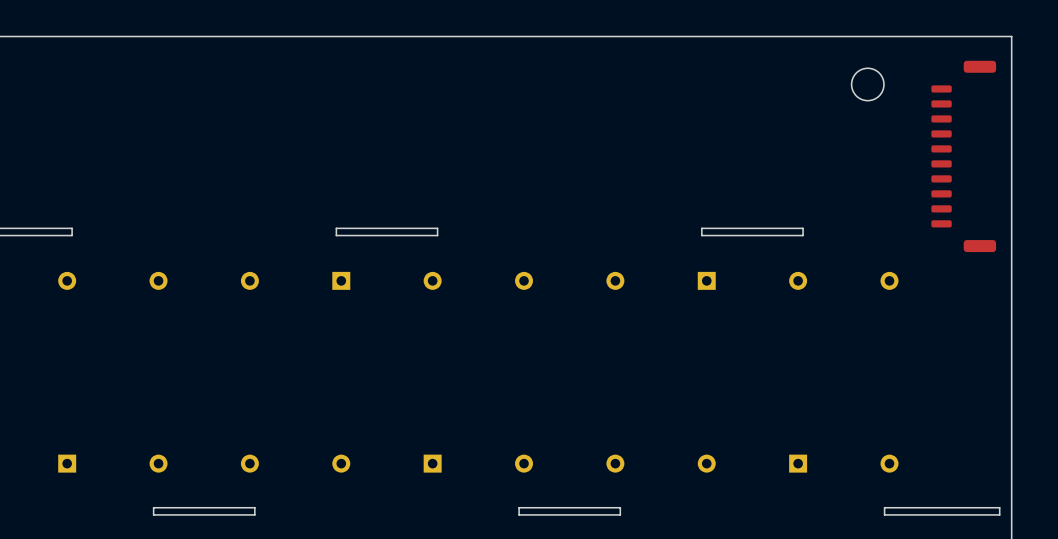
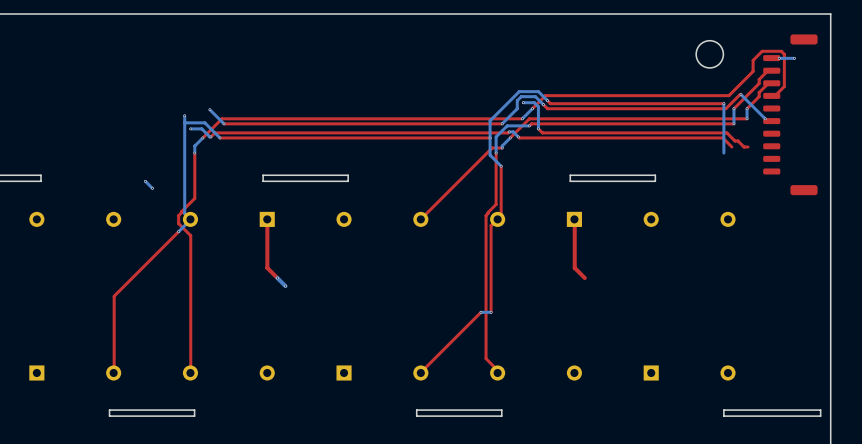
via: none -> (779, 58)
bottom track: none -> (794, 58) (779, 58)
via: none -> (794, 58)
top track: none -> (771, 70) (768, 70) (759, 79) (759, 83) (733, 108)
top track: none -> (771, 83) (768, 83) (759, 92) (759, 96) (747, 108)
top track: none -> (741, 94) (725, 108) (547, 108) (543, 104)
bottom track: none -> (741, 94) (765, 118)
via: none -> (741, 94)
top track: none -> (771, 95) (775, 95) (784, 86) (784, 54) (781, 51) (762, 51) (753, 60) (753, 71) (728, 95) (545, 95) (532, 108)
top track: none -> (547, 100) (550, 103) (723, 103)
bottom track: none -> (547, 100) (538, 91) (519, 91) (490, 120) (490, 155) (501, 166)
via: none -> (547, 100)
bottom track: none -> (523, 102) (534, 102) (538, 106) (538, 128)
via: none -> (523, 102)
bottom track: none -> (723, 103) (723, 153)
via: none -> (723, 103)
bottom track: none -> (543, 104) (535, 96) (521, 96) (517, 100) (517, 108) (502, 123)
via: none -> (543, 104)
bottom track: none -> (532, 108) (522, 118)
via: none -> (532, 108)
bottom track: none -> (733, 108) (733, 123)
via: none -> (733, 108)
bottom track: none -> (747, 108) (747, 118)
via: none -> (747, 108)
bottom track: none -> (209, 109) (224, 123)
via: none -> (209, 109)
bottom track: none -> (184, 115) (184, 213) (190, 219) (178, 231)
via: none -> (184, 115)
top track: none -> (522, 118) (222, 118) (202, 137)
via: none -> (522, 118)
top track: none -> (747, 118) (529, 118) (510, 137)
via: none -> (747, 118)
via: none -> (765, 118)
bottom track: none -> (184, 122) (204, 122) (219, 137)
via: none -> (224, 123)
top track: none -> (502, 123) (224, 123)
via: none -> (502, 123)
top track: none -> (733, 123) (531, 123) (529, 125)
via: none -> (733, 123)
bottom track: none -> (529, 125) (507, 125) (496, 136) (496, 153)
via: none -> (529, 125)
bottom track: none -> (190, 128) (201, 128) (210, 136)
via: none -> (190, 128)
top track: none -> (538, 128) (542, 132) (726, 132) (734, 140) (737, 140) (744, 147) (748, 147)
via: none -> (538, 128)
top track: none -> (509, 131) (214, 132) (210, 136)
bottom track: none -> (509, 131) (513, 131) (518, 136)
via: none -> (509, 131)
via: none -> (210, 136)
top track: none -> (518, 136) (722, 137) (731, 147)
via: none -> (518, 136)
bottom track: none -> (202, 137) (194, 146) (194, 153)
via: none -> (202, 137)
via: none -> (219, 137)
top track: none -> (490, 137) (219, 137)
via: none -> (490, 137)
bottom track: none -> (510, 137) (502, 148)
via: none -> (510, 137)
top track: none -> (502, 148) (492, 148) (420, 219)
via: none -> (502, 148)
top track: none -> (194, 153) (194, 198) (178, 215) (178, 223) (190, 235) (190, 372)
via: none -> (194, 153)
top track: none -> (496, 153) (496, 204) (486, 215) (486, 358) (497, 369)
via: none -> (496, 153)
top track: none -> (501, 166) (501, 215) (491, 225) (491, 312)
via: none -> (501, 166)
bottom track: none -> (145, 181) (152, 188)
via: none -> (145, 181)
via: none -> (152, 188)
top track: none -> (267, 219) (267, 267) (277, 278)
top track: none -> (574, 219) (574, 267) (584, 278)
top track: none -> (178, 231) (114, 296) (114, 372)
via: none -> (178, 231)
bottom track: none -> (277, 278) (285, 286)
via: none -> (277, 278)
via: none -> (285, 286)
top track: none -> (481, 312) (420, 372)
via: none -> (481, 312)
bottom track: none -> (491, 312) (481, 312)
via: none -> (491, 312)

